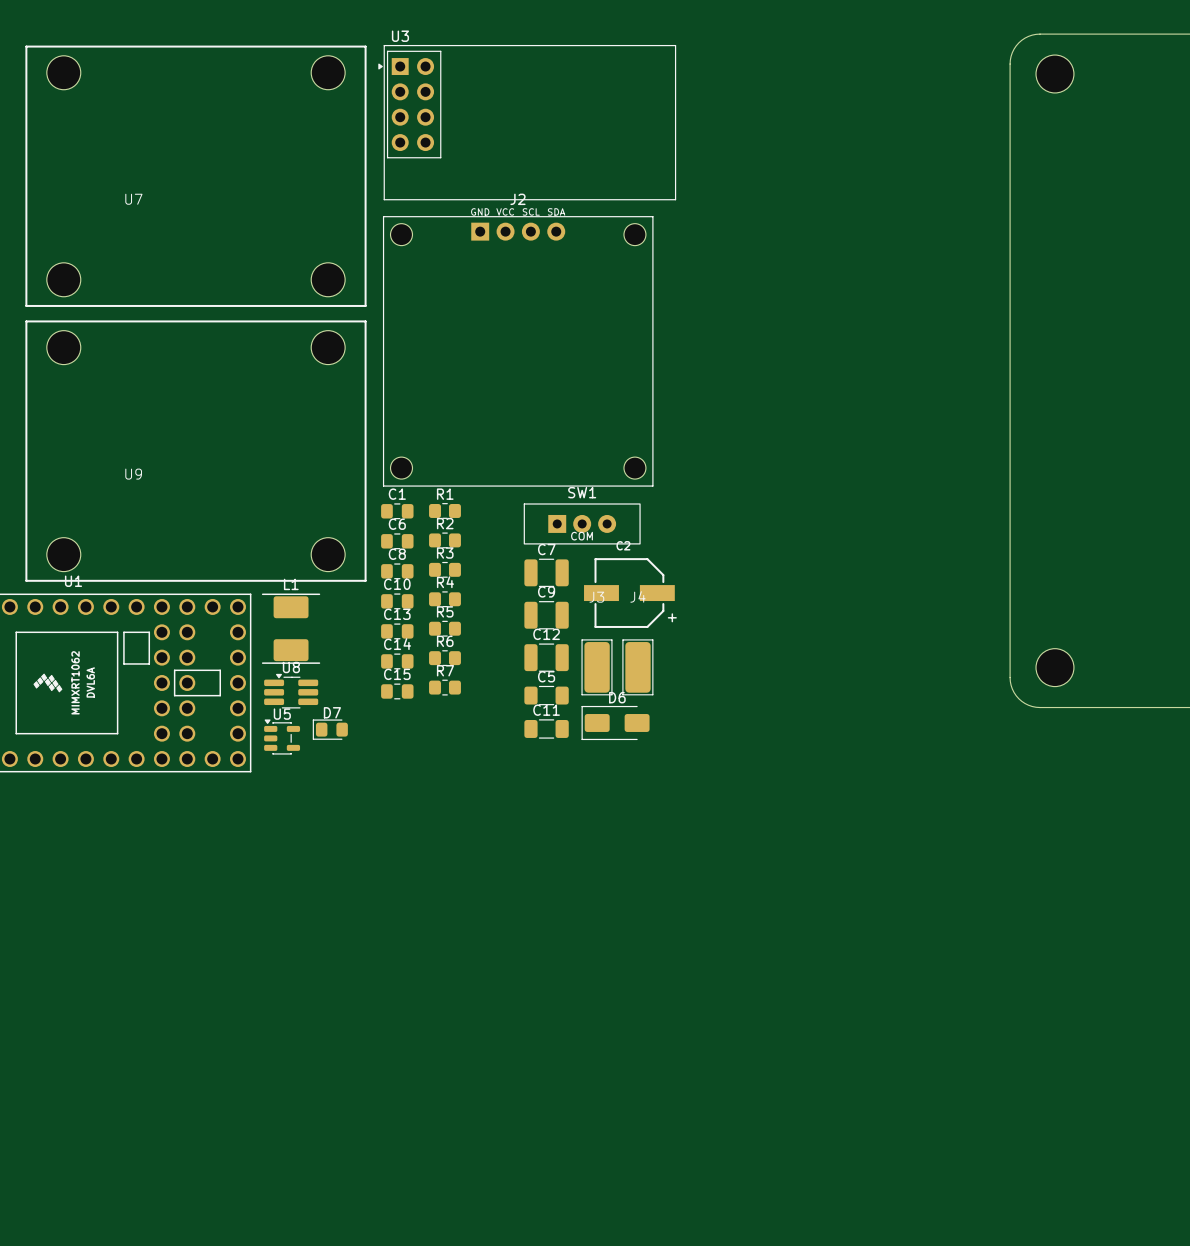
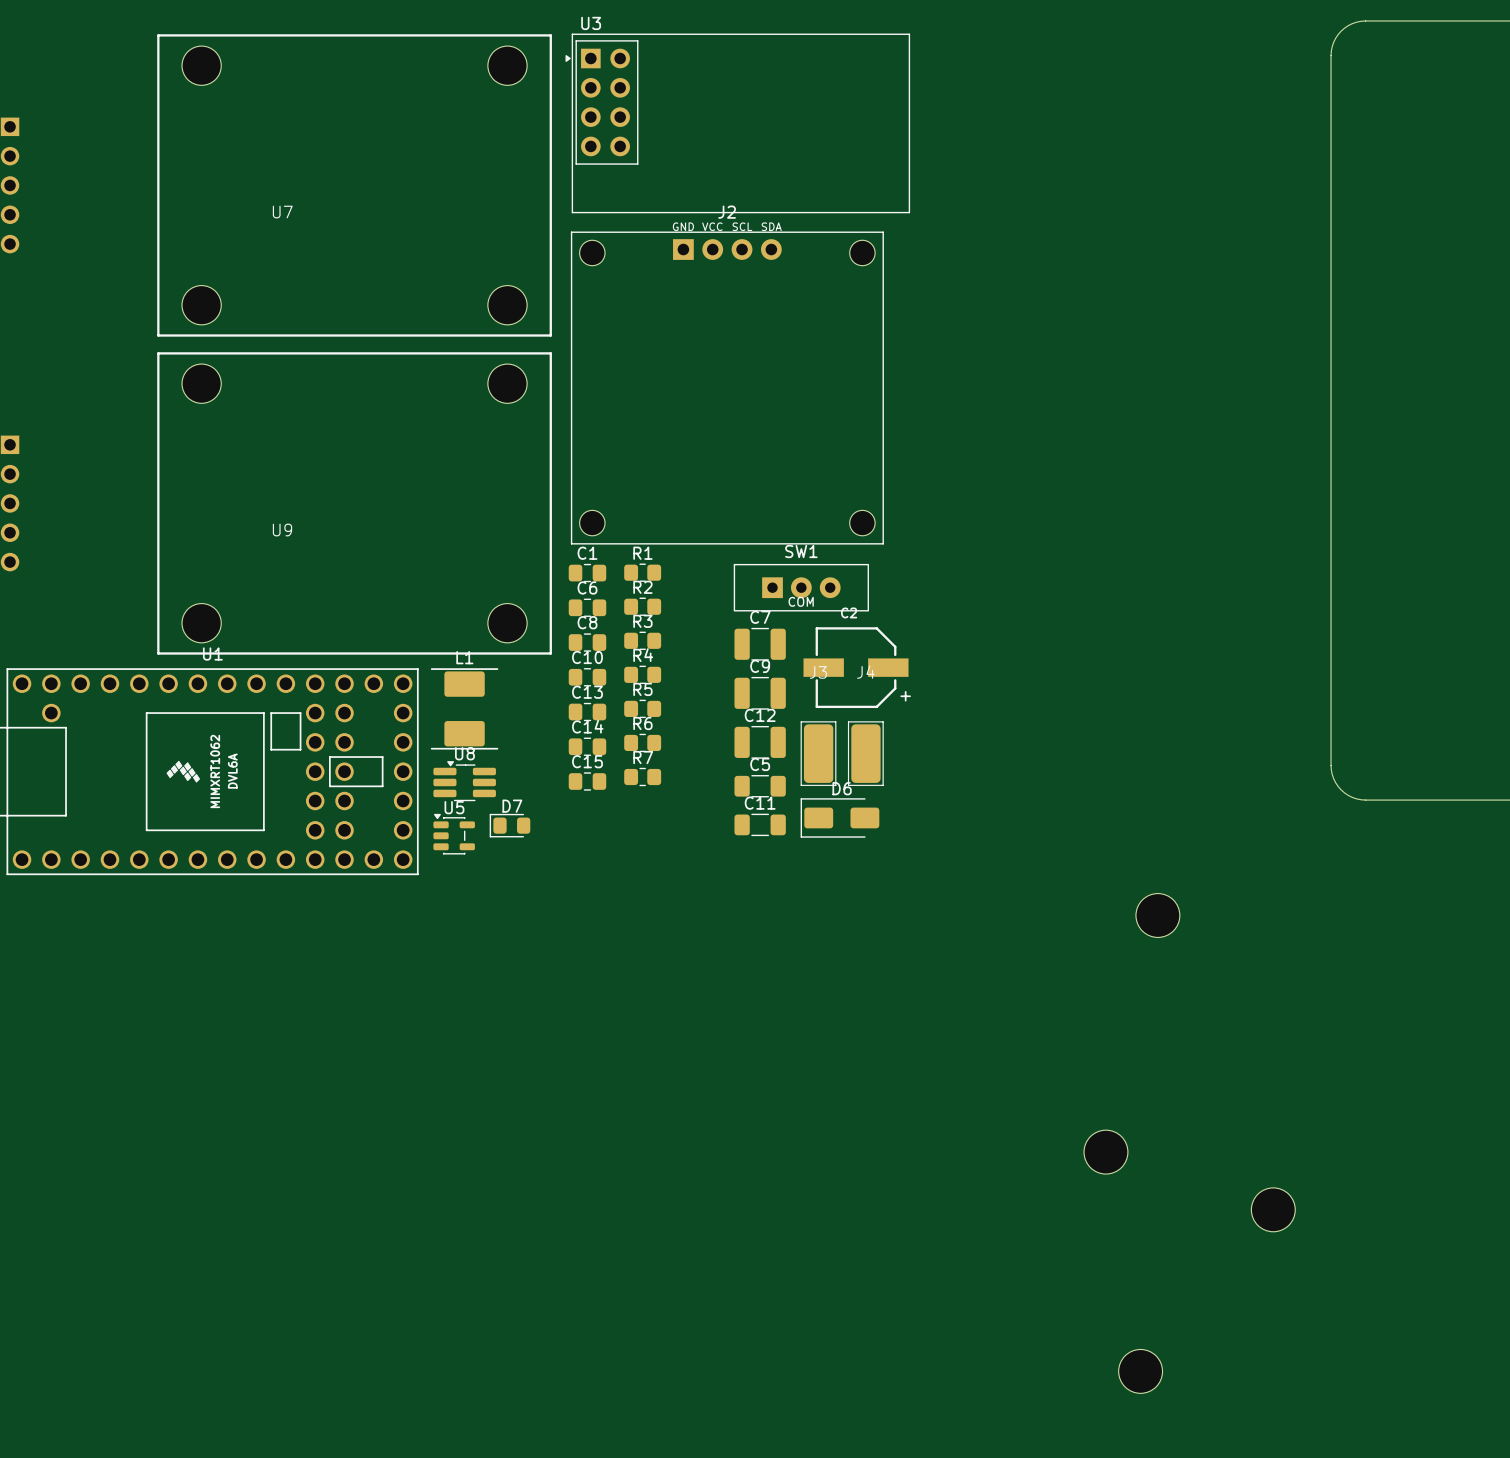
board edge: (1069, 34) (1036, 34) (1025, 38) (1014, 49) (1010, 64) (1010, 681) (1016, 695) (1028, 705) (1040, 707) (1069, 707) -> (1365, 20) (1352, 23) (1341, 31) (1333, 42) (1331, 55) (1331, 765) (1333, 778) (1341, 789) (1352, 797) (1365, 800)
part: (1054, 74) -> none
part: (1054, 667) -> none
part: none -> (1157, 915)
part: none -> (1105, 1152)
part: none -> (1273, 1209)
part: none -> (1140, 1371)

